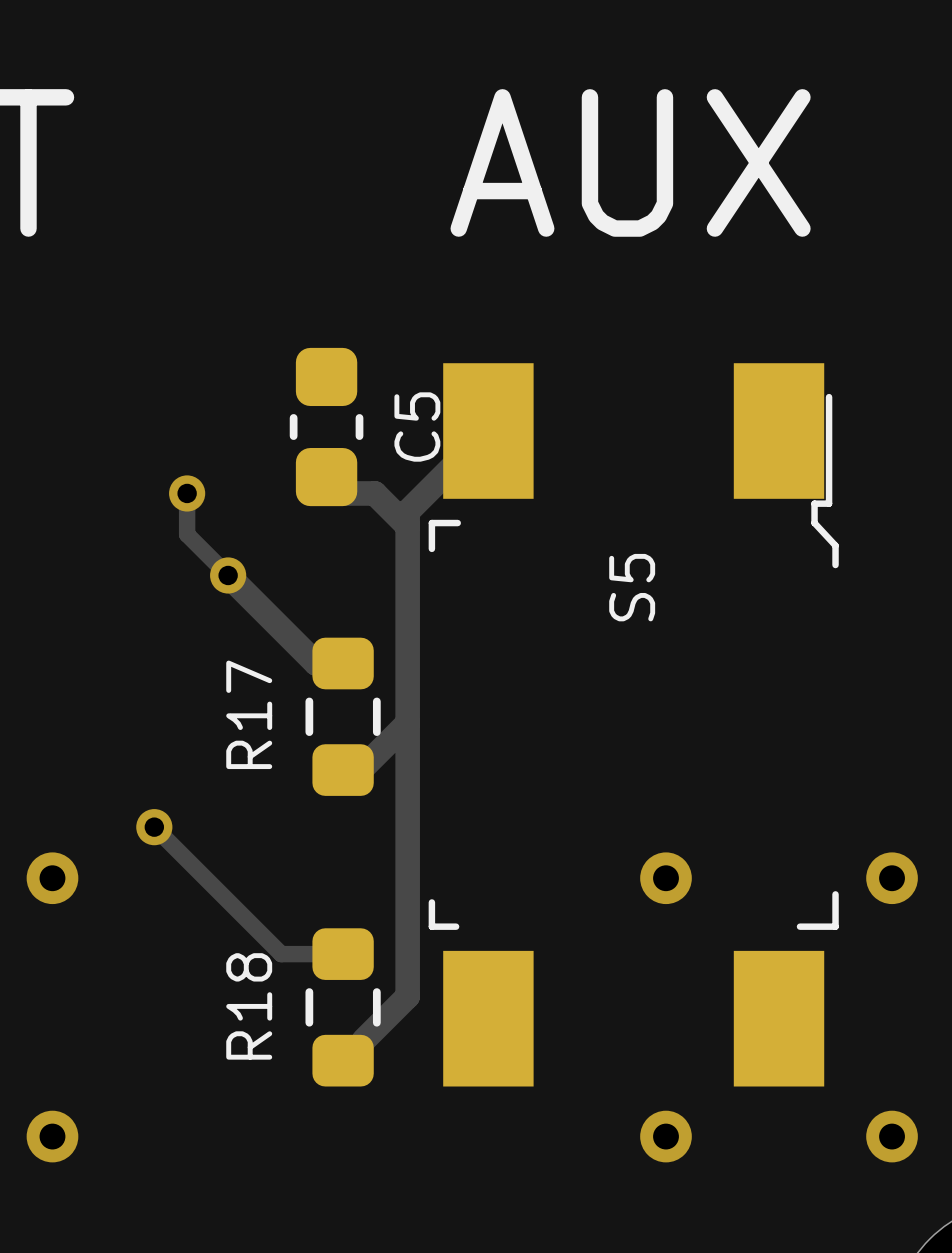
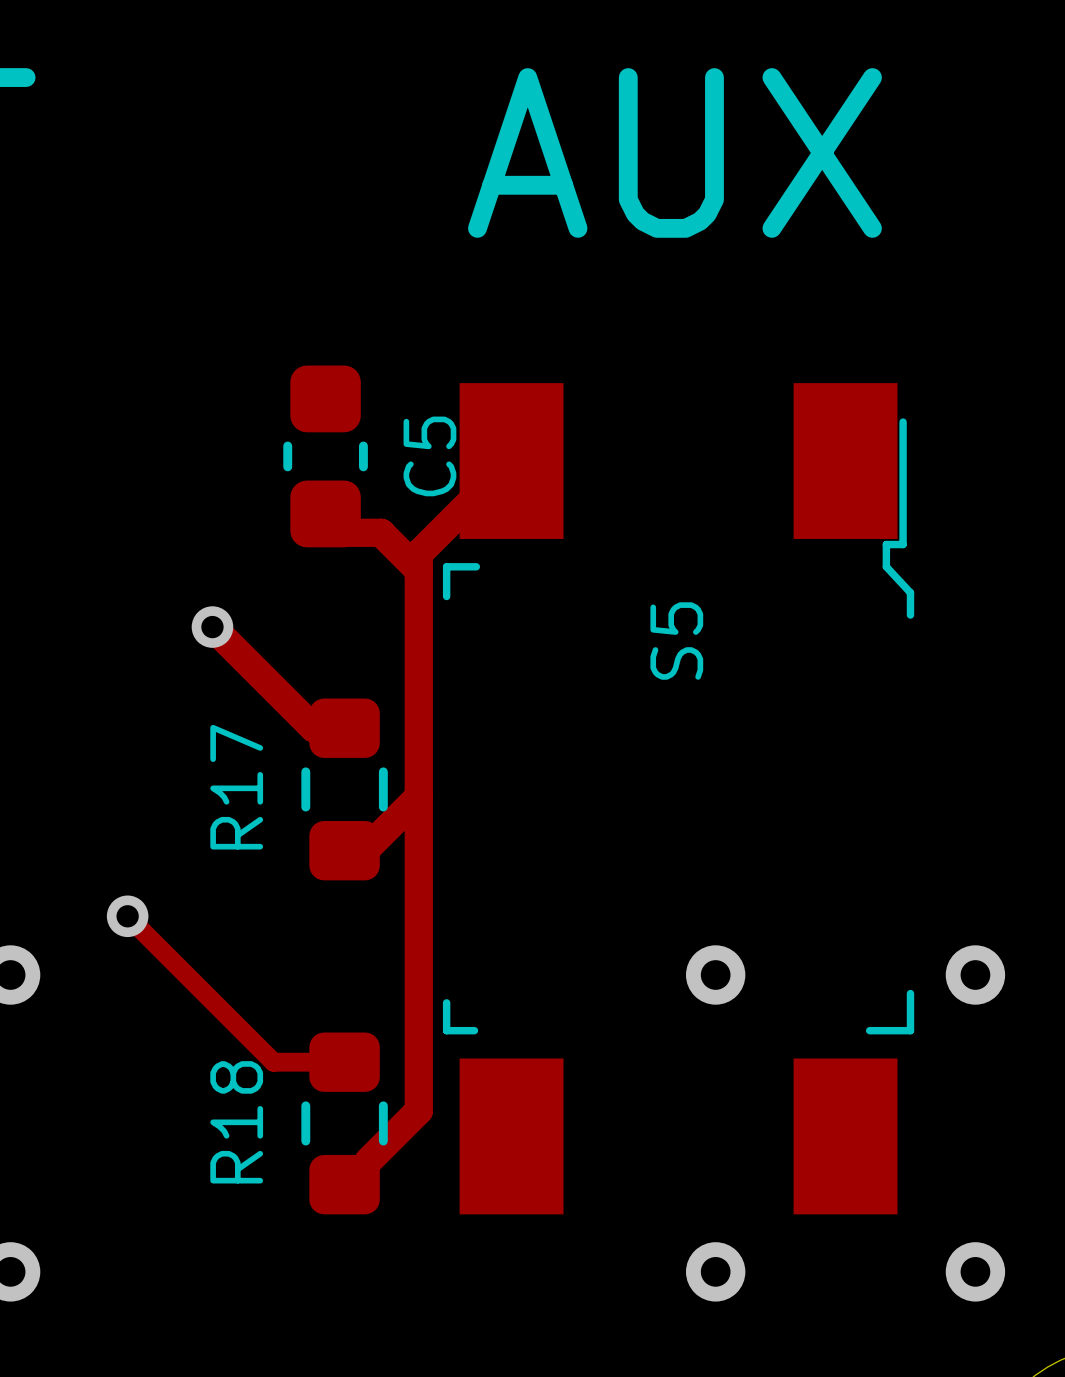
track: (187, 493) (187, 534) (228, 575) -> none
via: (187, 493) -> none

